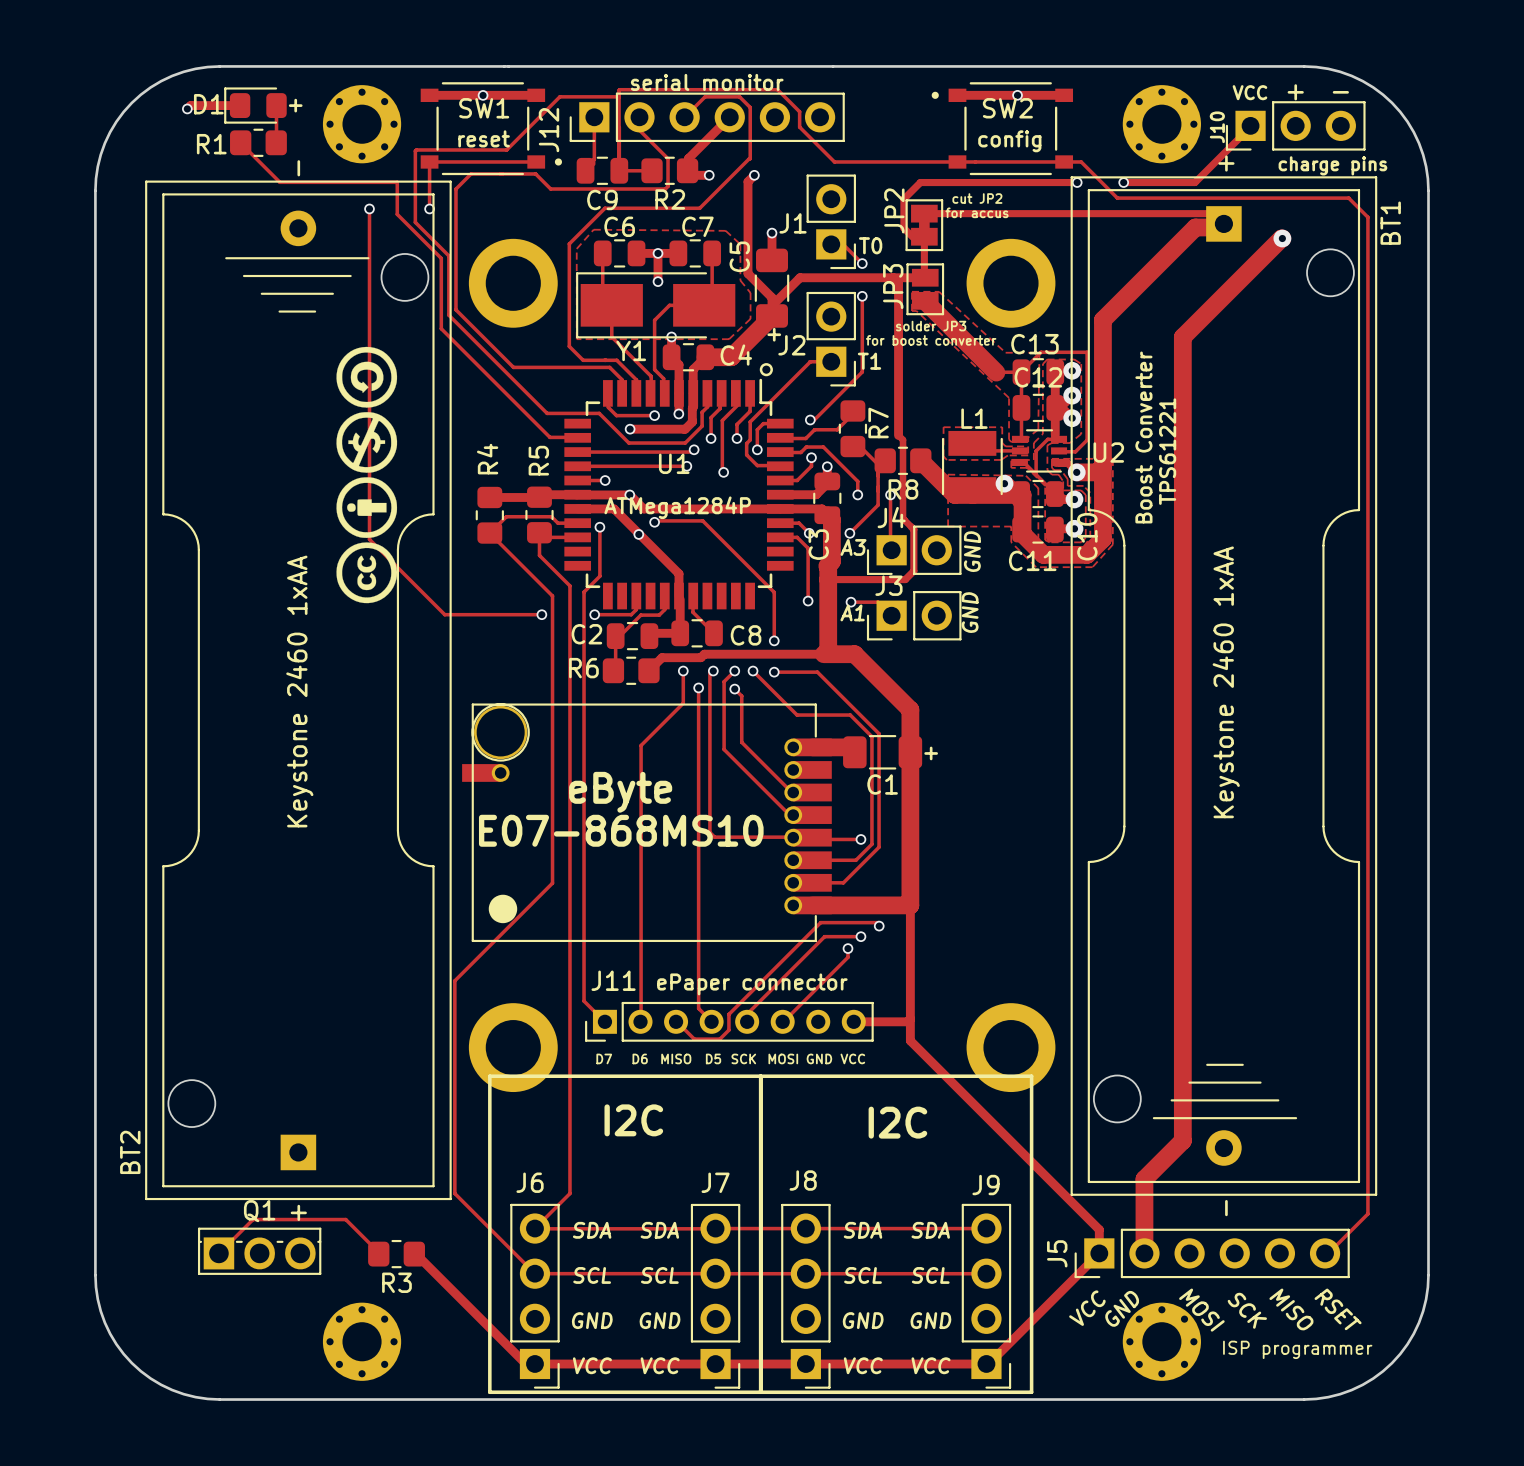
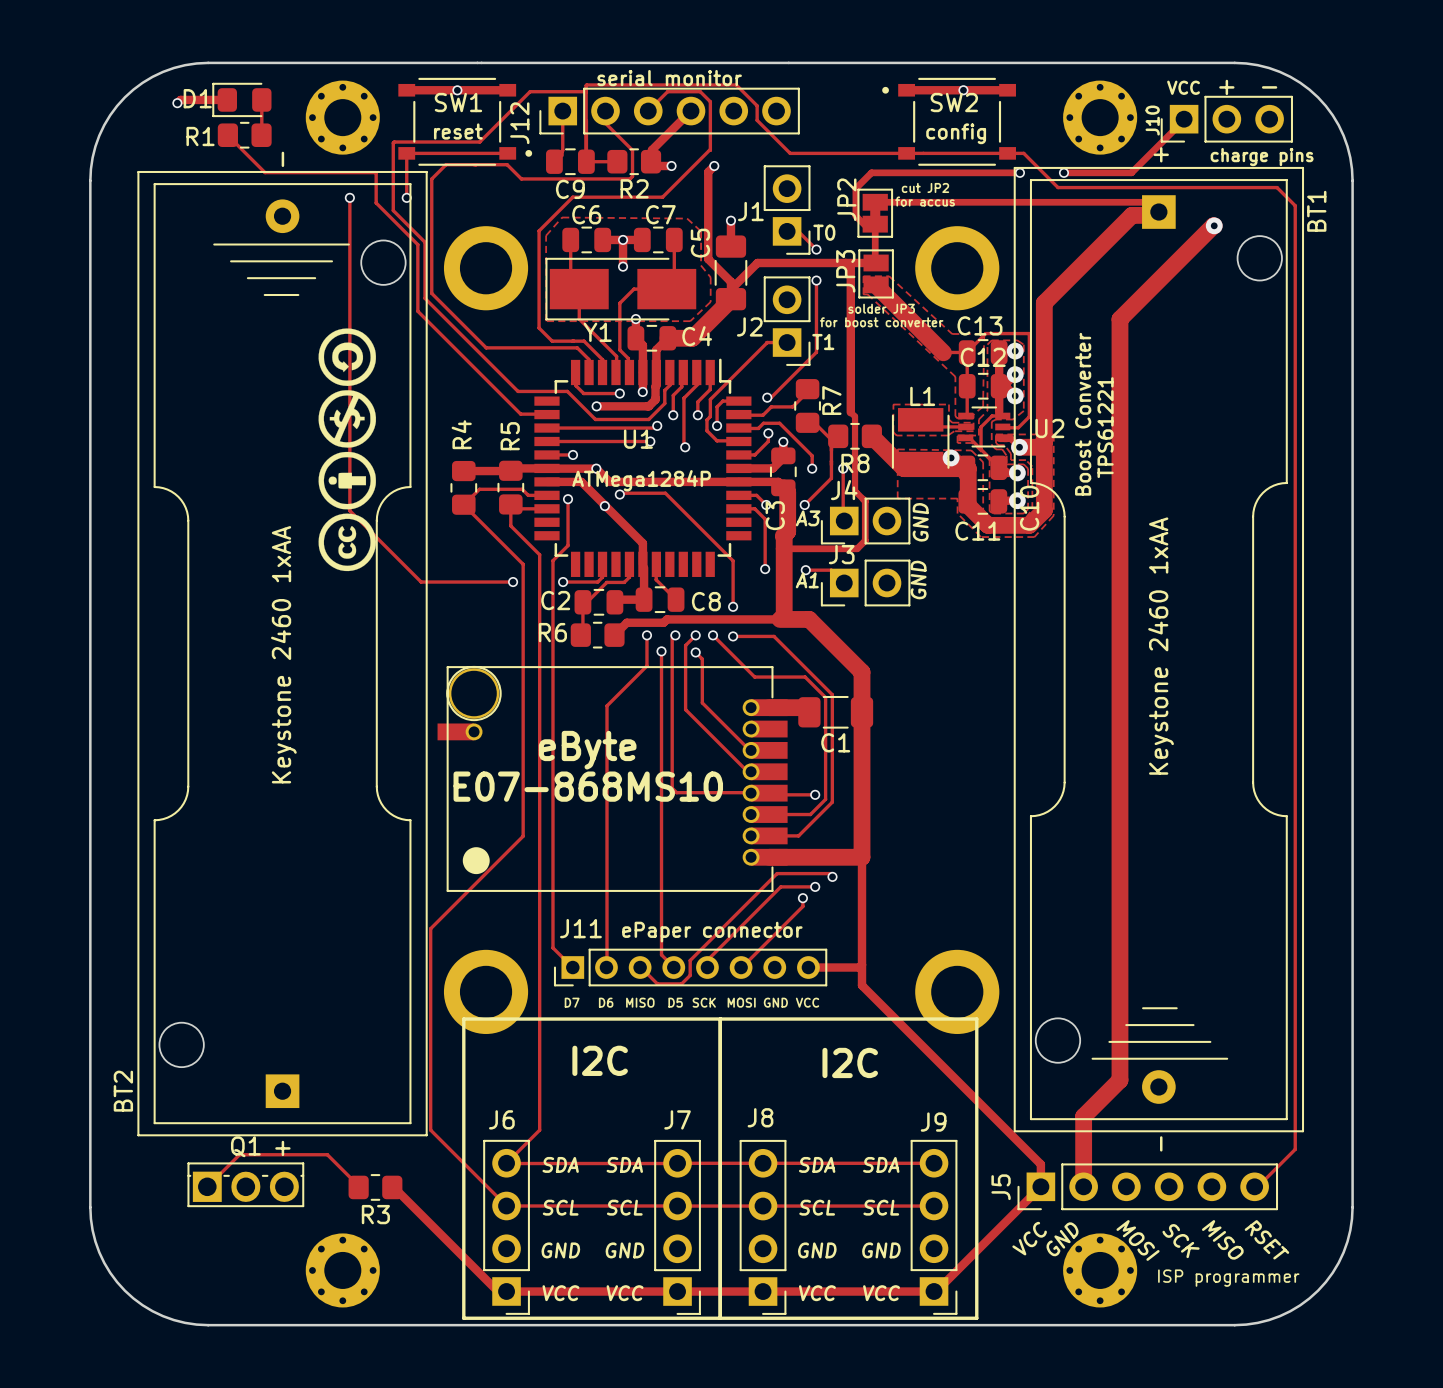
text: + (295, 105) -> none
text: + (774, 334) -> none
drawing: [759, 363, 773, 377] -> none
text: + (931, 753) -> none

